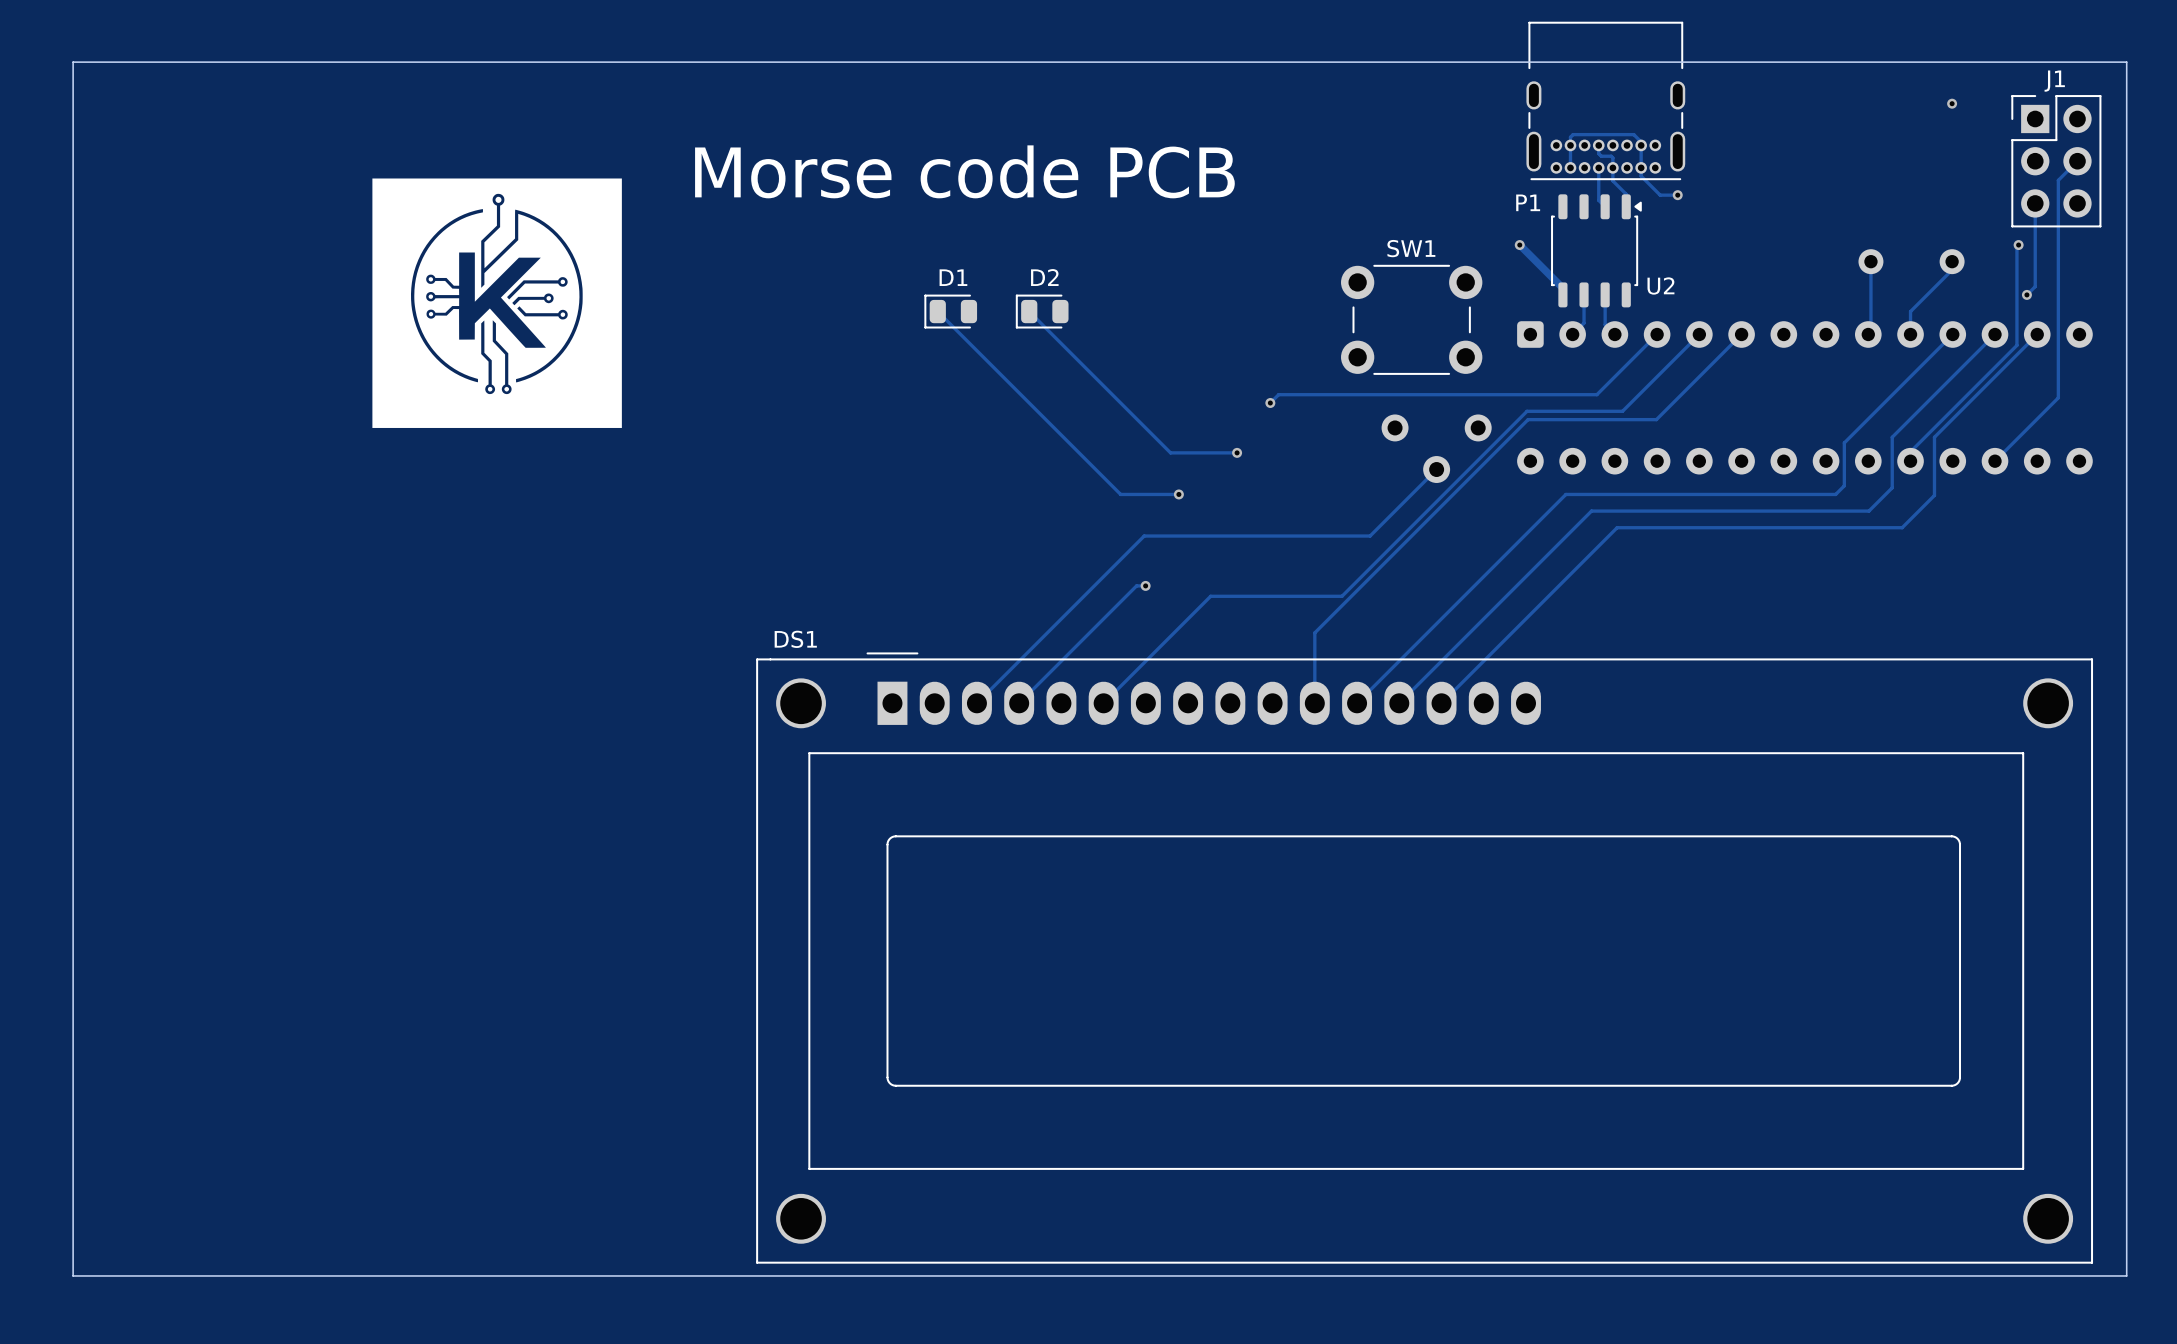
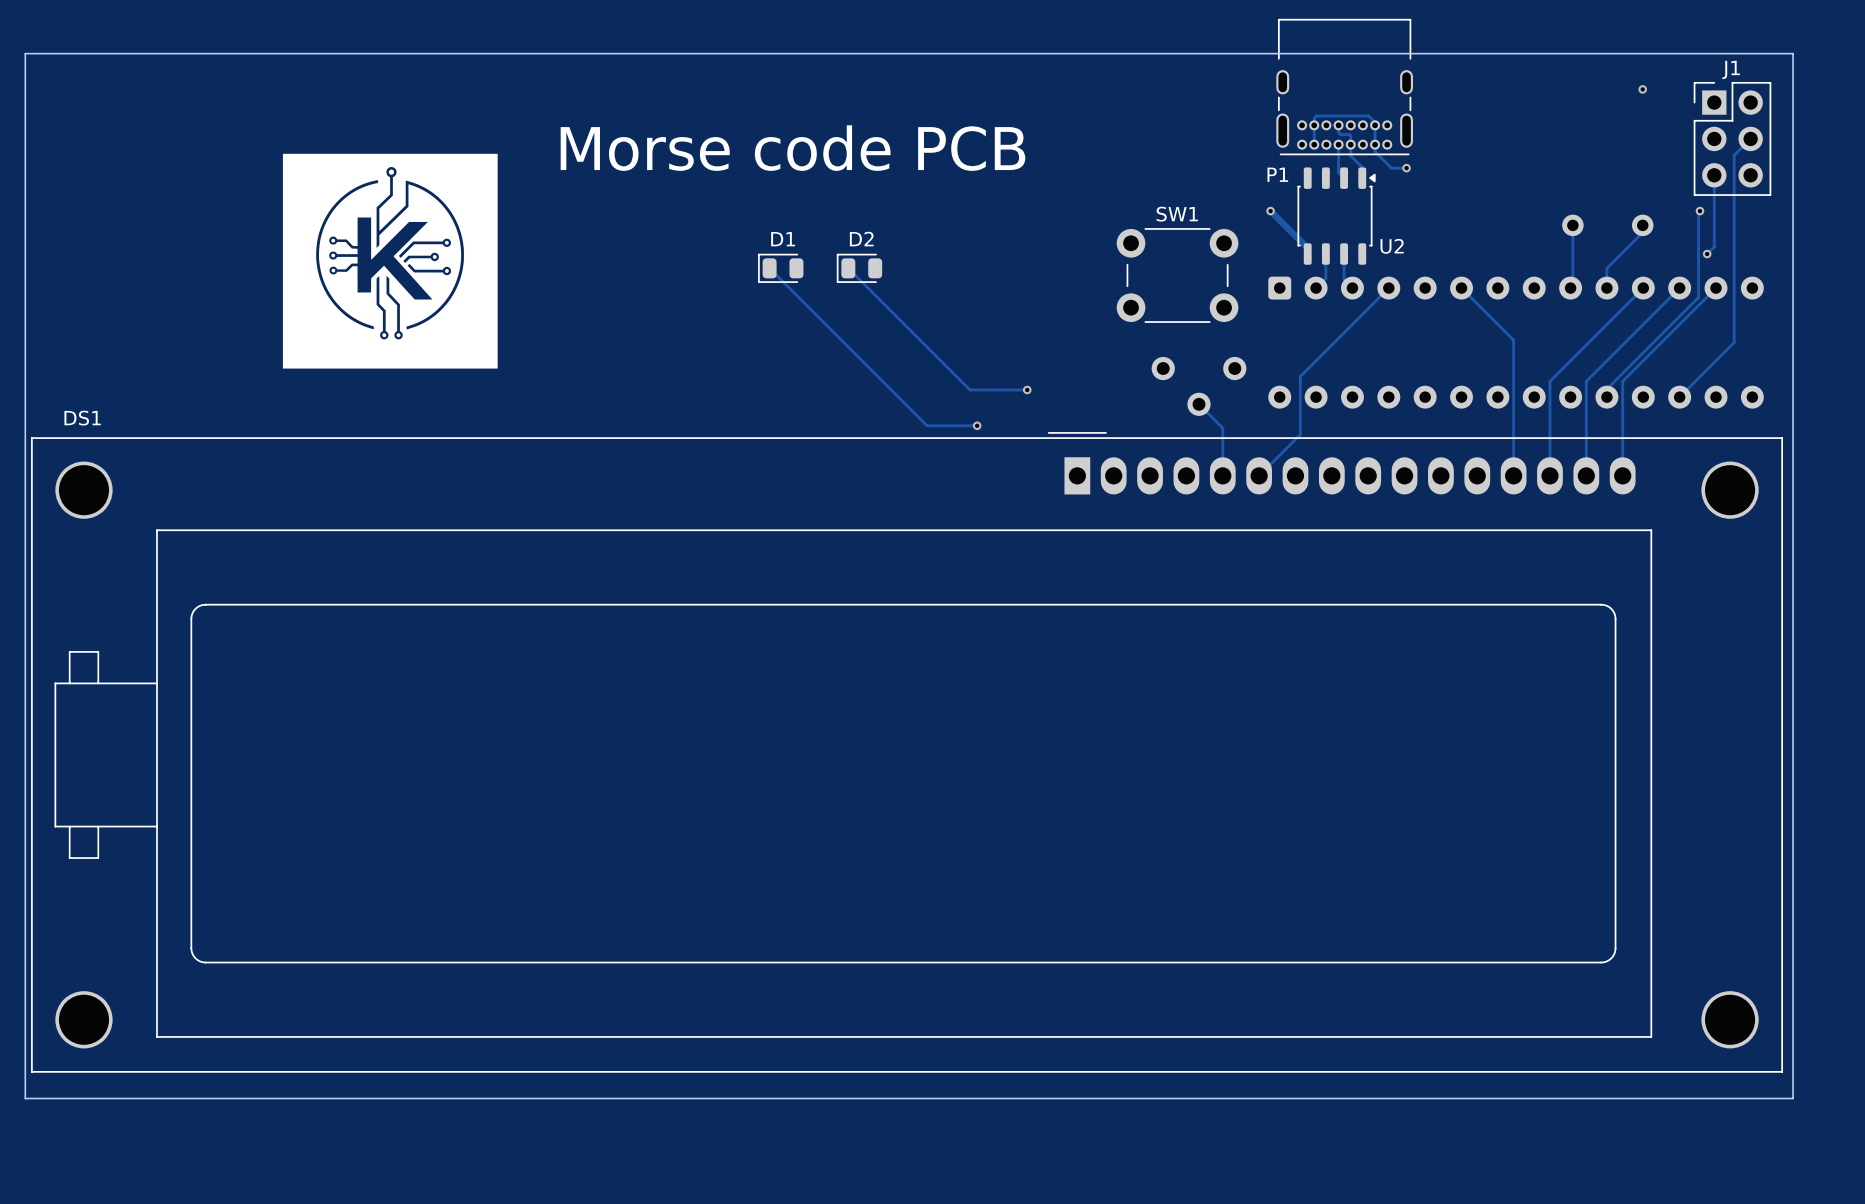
track: (1699, 334) (1622, 411) (1526, 411) (1342, 596) (1210, 596) (1103, 703) -> none
track: (1741, 334) (1656, 419) (1528, 419) (1314, 632) (1314, 703) -> (1461, 288) (1513, 340) (1513, 475)
track: (1596, 394) (1278, 394) (1270, 403) -> (1337, 339) (1300, 376) (1300, 434) (1259, 475)
via: (1270, 403) -> none
track: (1892, 437) (1892, 487) (1868, 511) (1591, 511) (1399, 703) -> (1591, 376) (1586, 381) (1586, 475)
track: (1934, 437) (1934, 495) (1902, 527) (1617, 527) (1441, 703) -> (1627, 376) (1622, 381) (1622, 475)
track: (1436, 469) (1370, 536) (1144, 536) (976, 703) -> (1199, 404) (1222, 428) (1222, 475)
track: (1844, 485) (1835, 494) (1565, 494) (1357, 703) -> (1549, 418) (1549, 475)
track: (1145, 585) (1136, 585) (1019, 703) -> none
via: (1145, 585) -> none
DS1 name position: DS1 (795, 639) -> DS1 (82, 418)
DS1 footprint: [756, 652, 2094, 1264] -> [31, 432, 1784, 1073]

